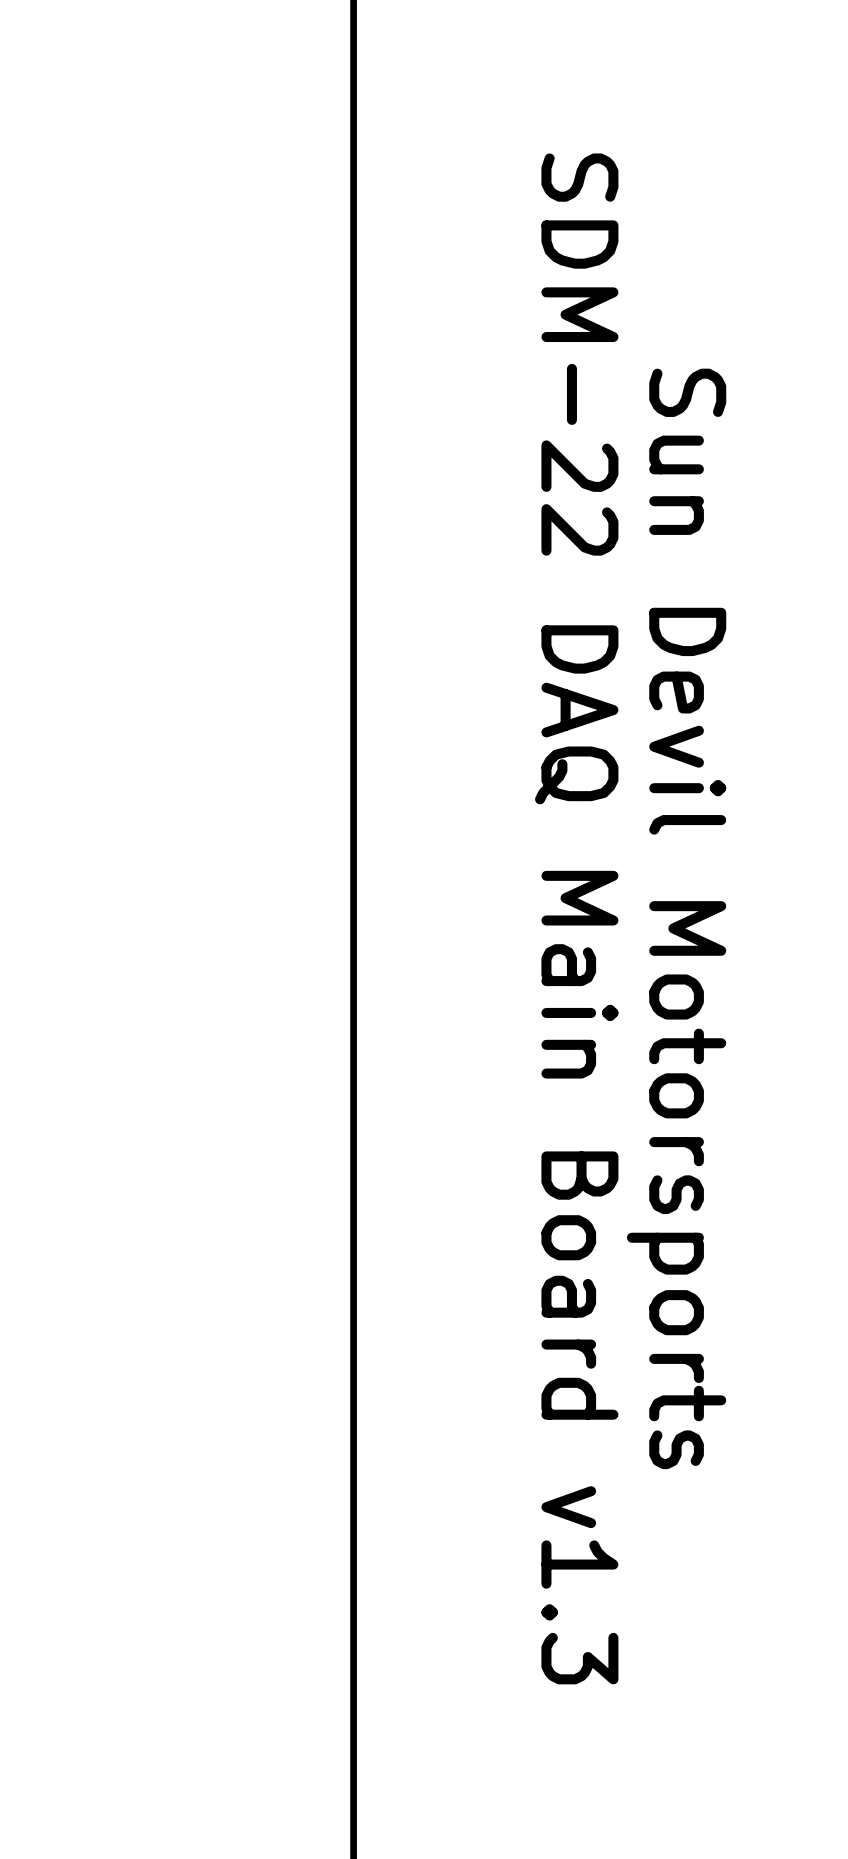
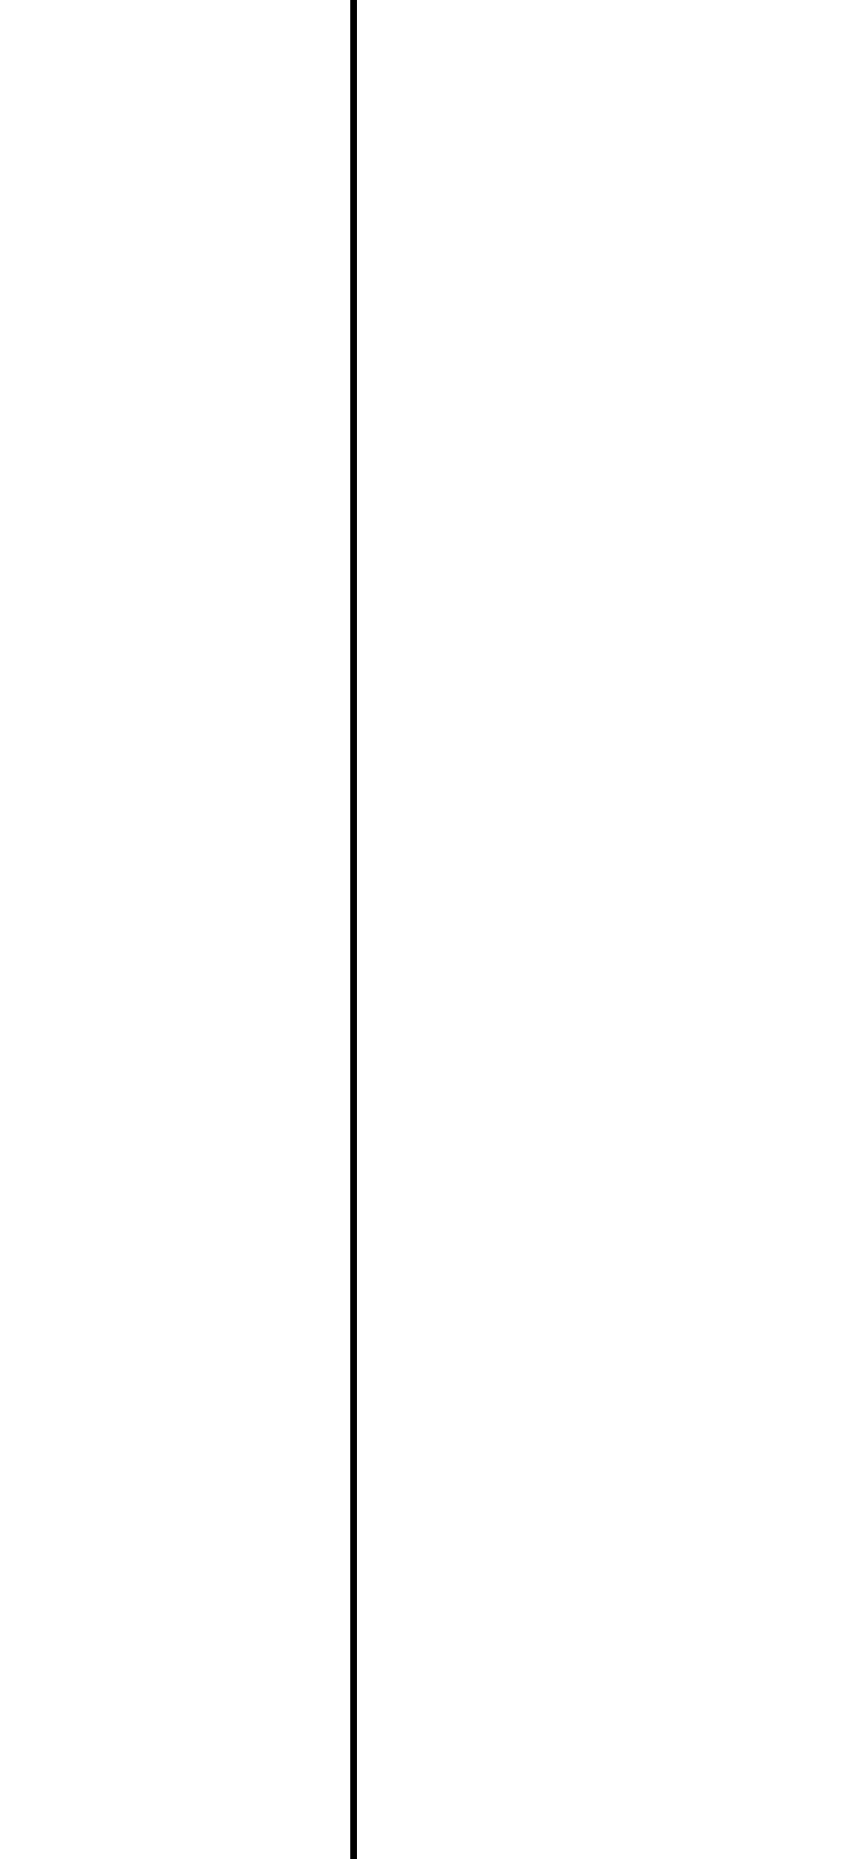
text: SDM-22 DAQ Main Board v1.3 (576, 918) -> none
text: Sun Devil Motorsports (676, 918) -> none

